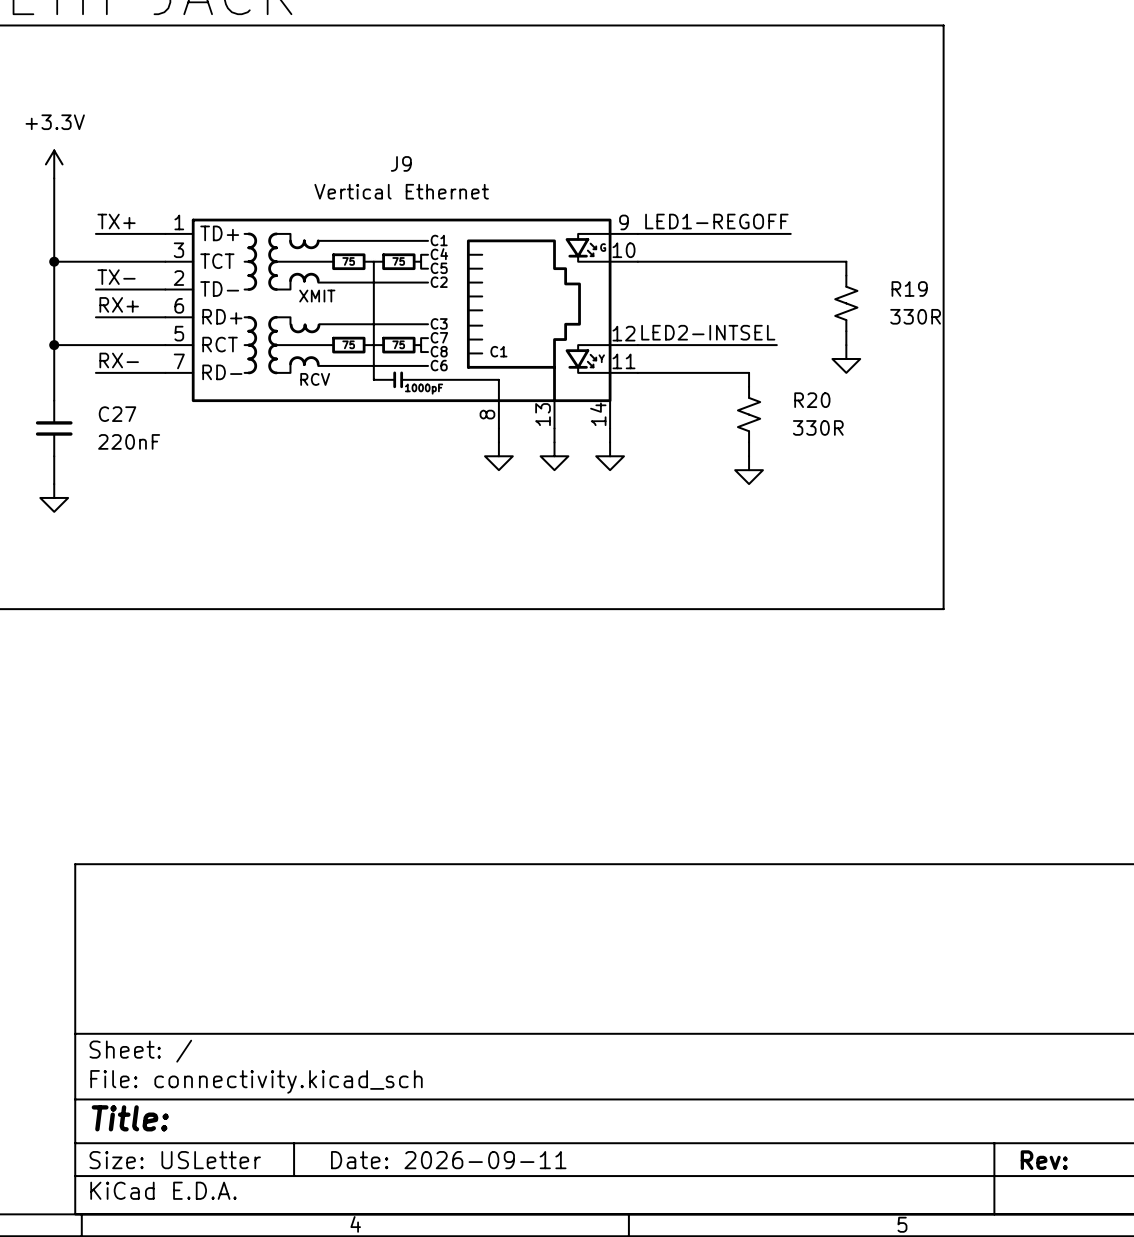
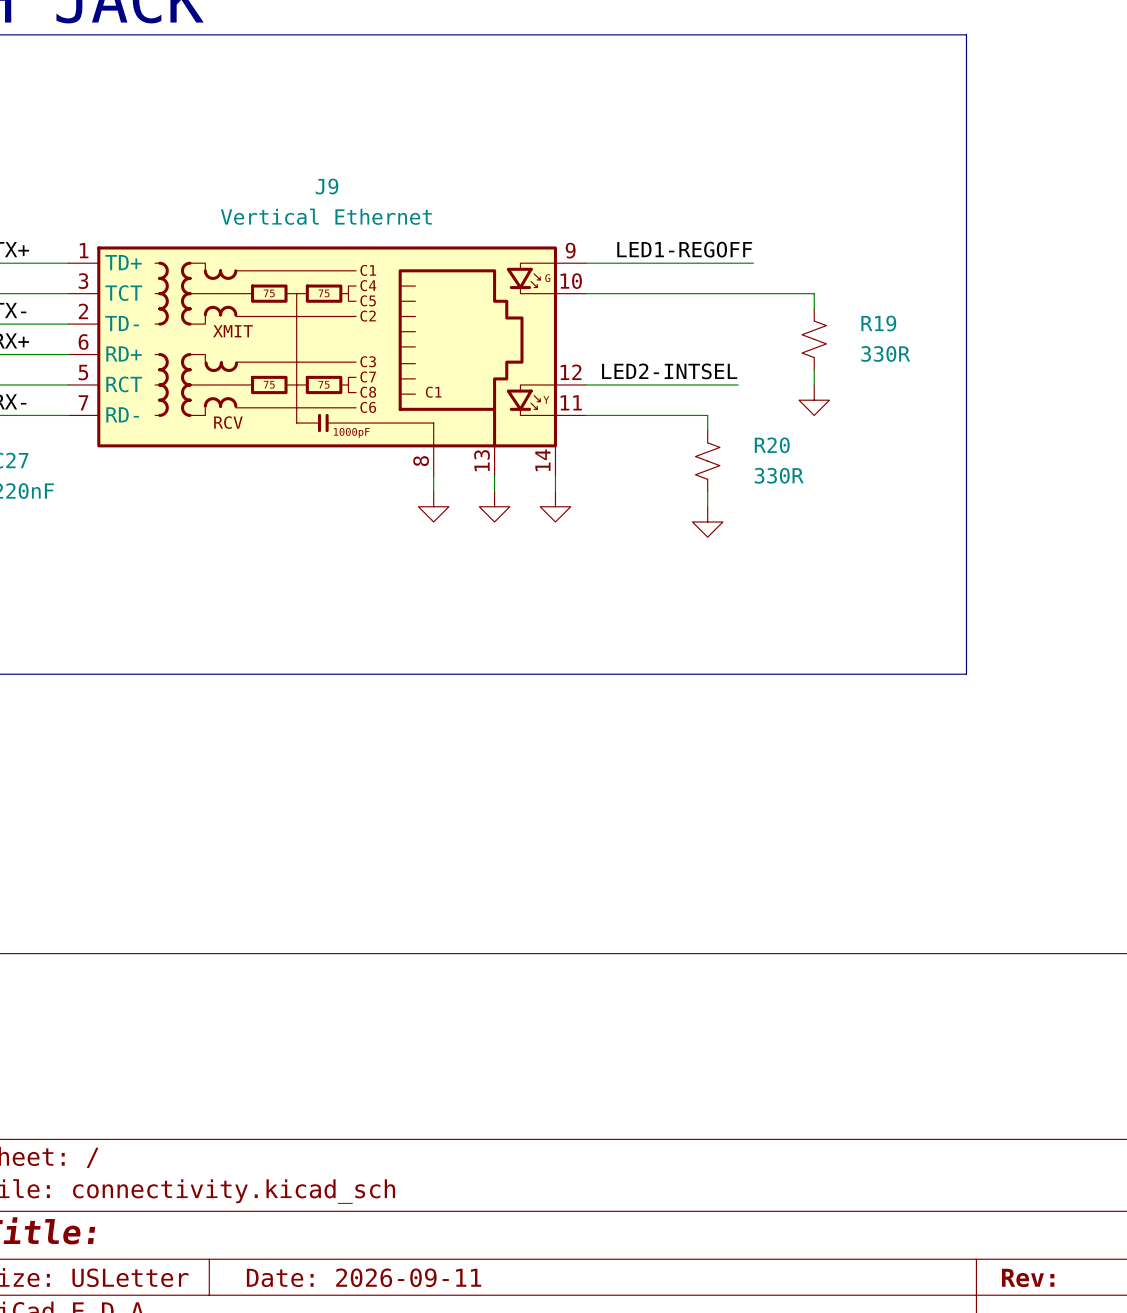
line: (943, 25) (943, 609) -> (920, 34) (966, 34) (966, 674) (920, 674)

